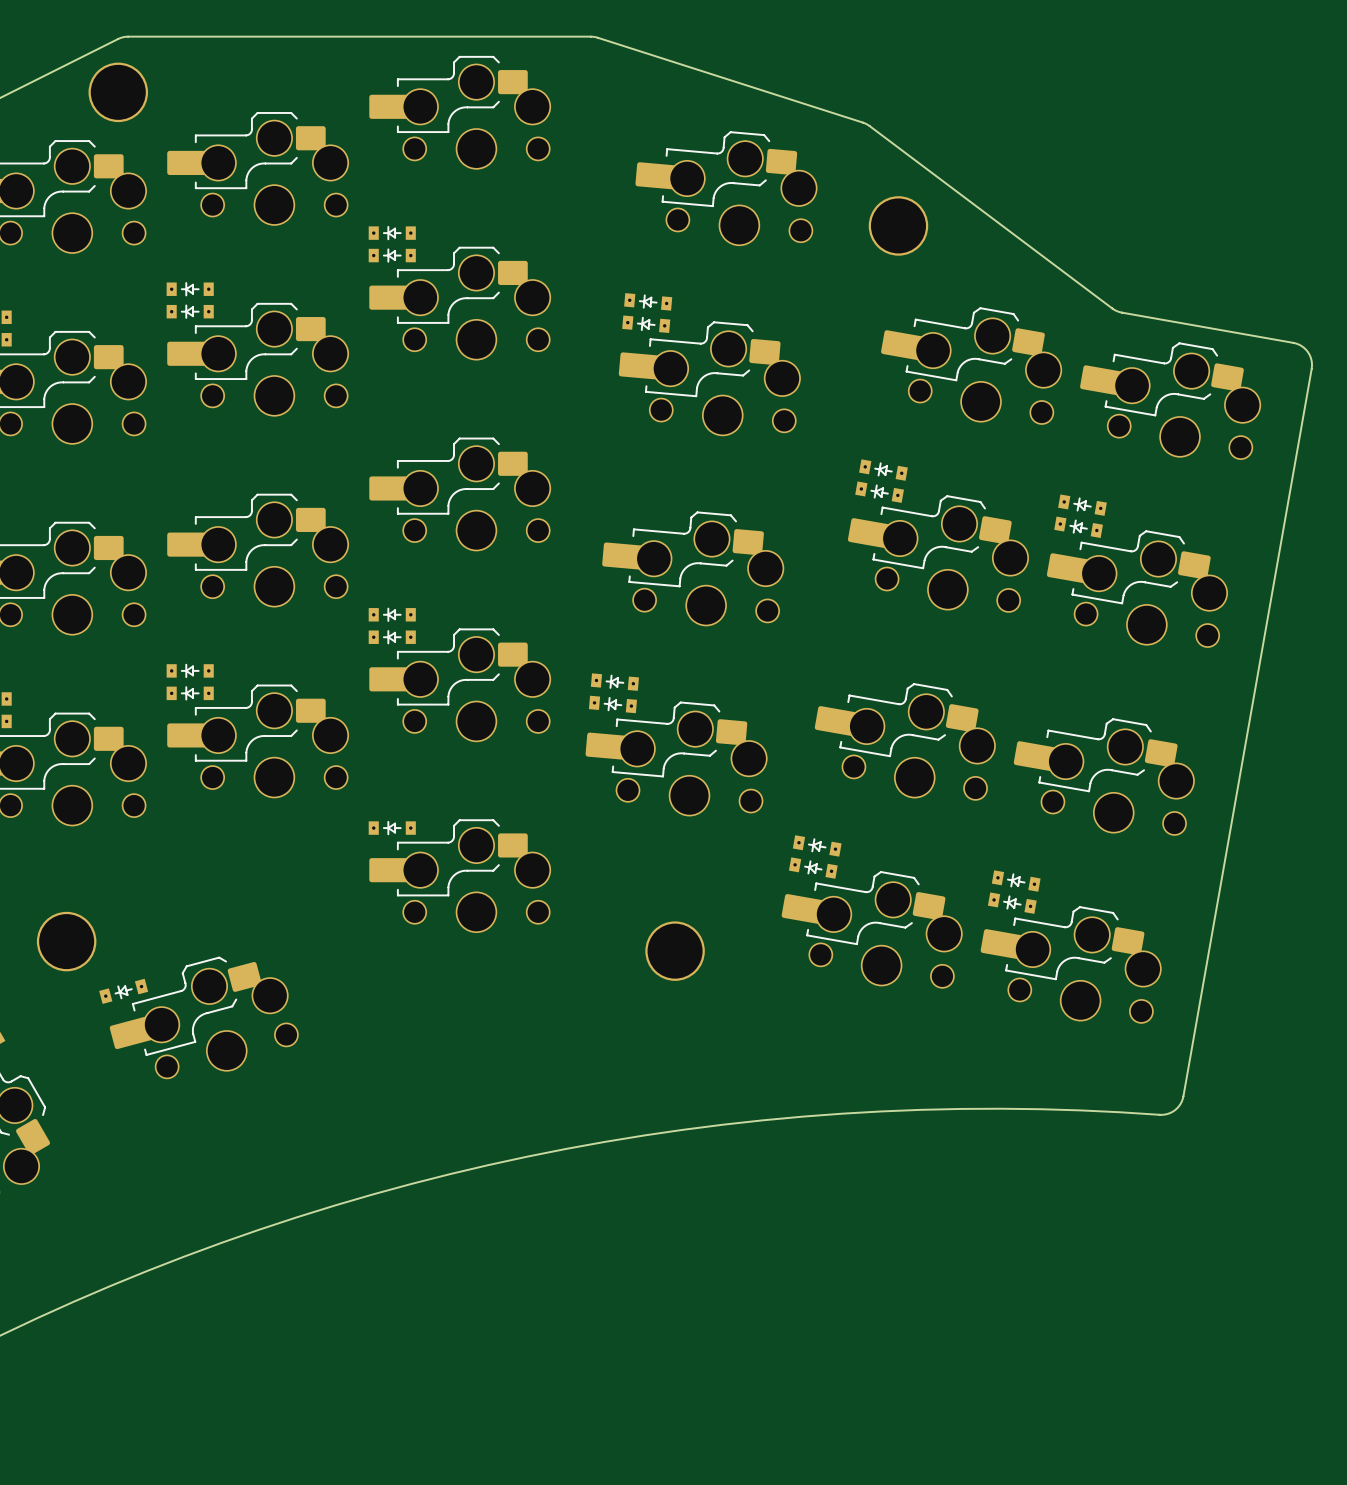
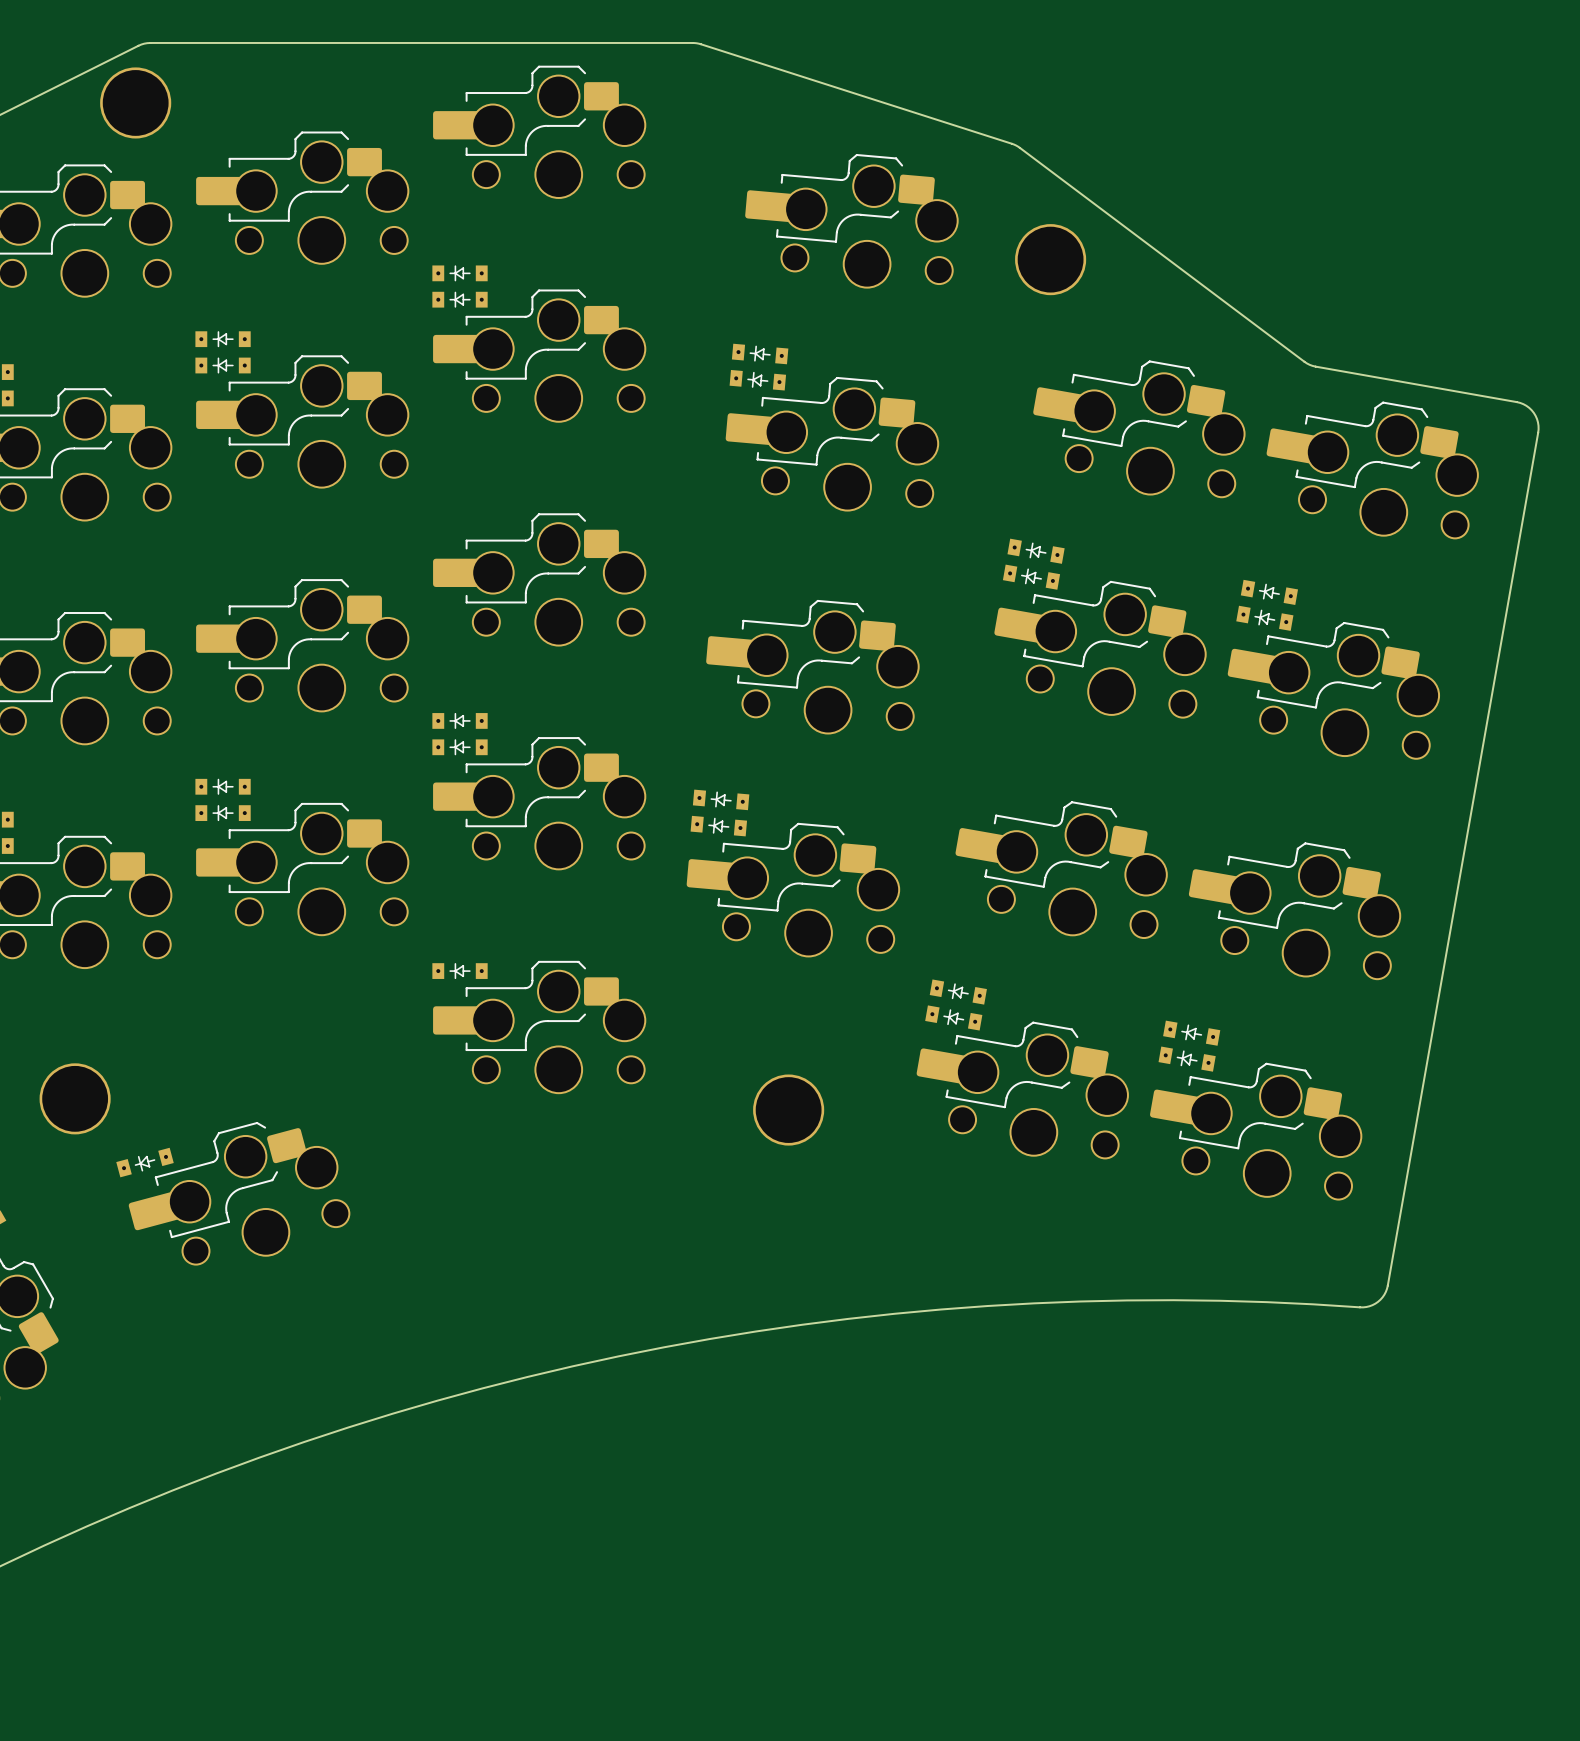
part footprint: [88, 62, 149, 123] -> [100, 67, 172, 139]
part footprint: [868, 196, 929, 256] -> [1015, 224, 1087, 296]
part footprint: [36, 911, 97, 972] -> [39, 1063, 111, 1135]
part footprint: [645, 921, 705, 981] -> [753, 1074, 825, 1146]

